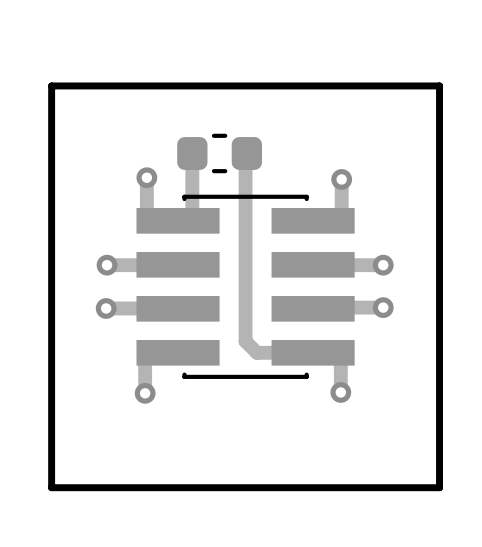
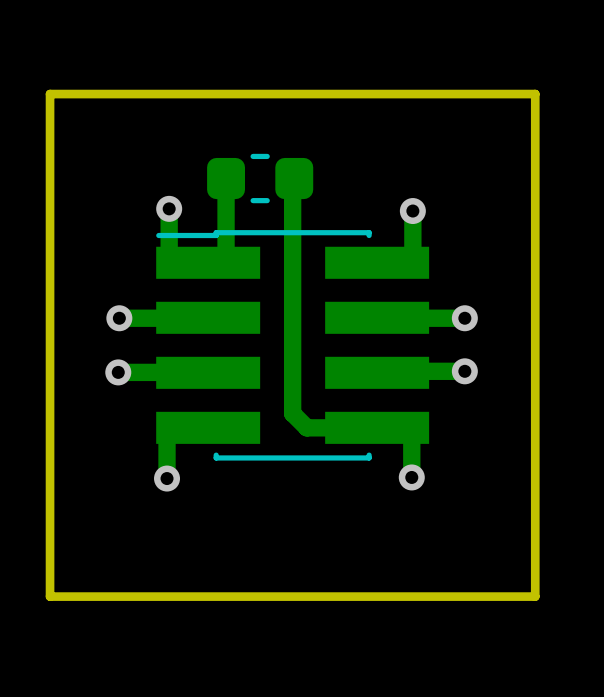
part footprint: [136, 194, 355, 379] -> [156, 230, 430, 461]

